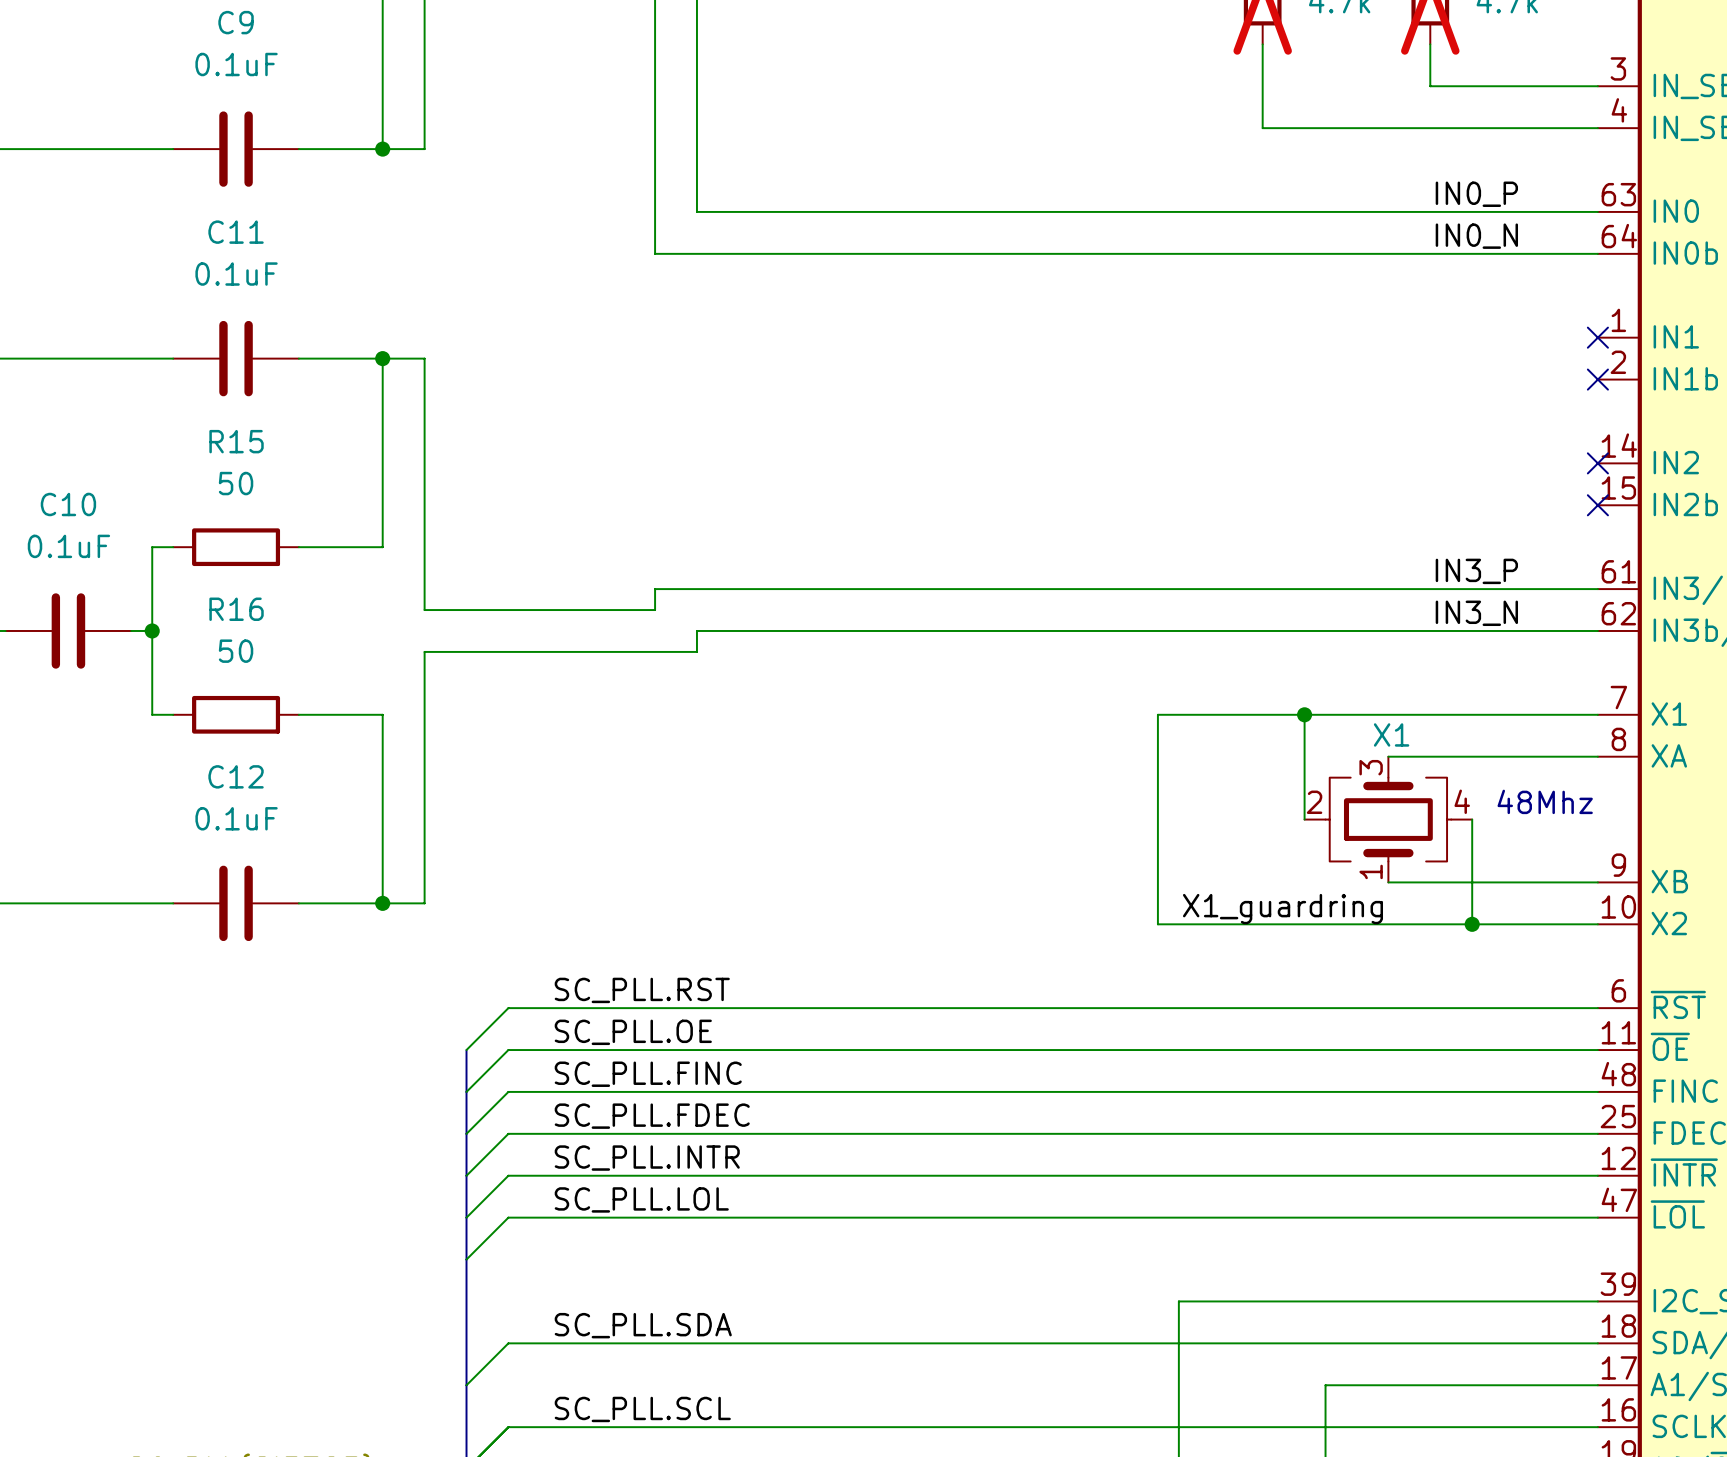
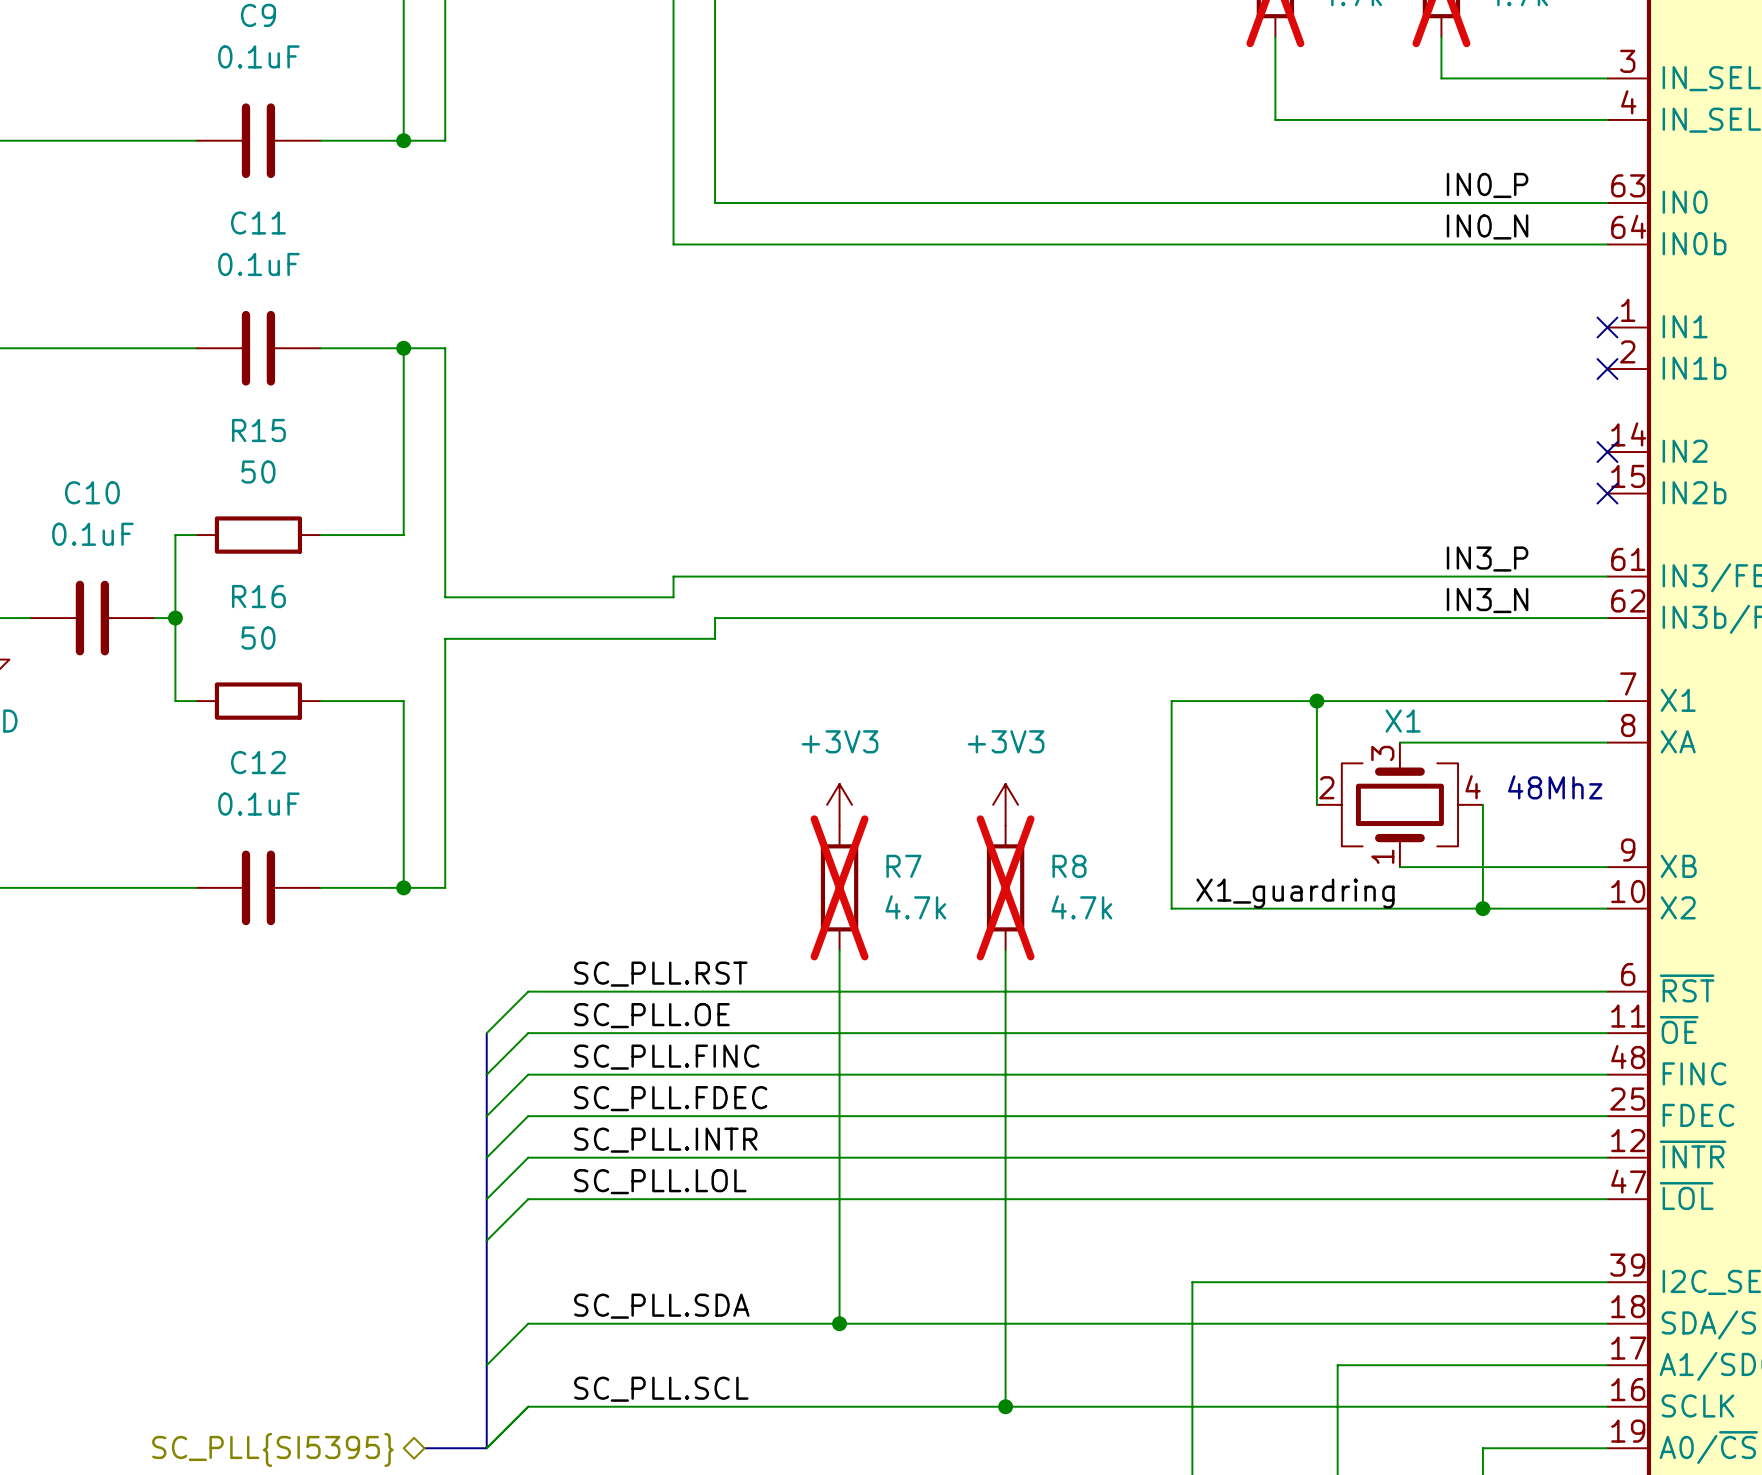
power symbol: none -> +3V3 (839, 804)
power symbol: none -> +3V3 (1005, 804)
R7: none -> 4.7k (839, 887)
R8: none -> 4.7k (1005, 887)
wire: none -> (839, 950) (839, 1323)
wire: none -> (1005, 950) (1005, 1406)
junction: none -> (839, 1323)
junction: none -> (1005, 1406)

